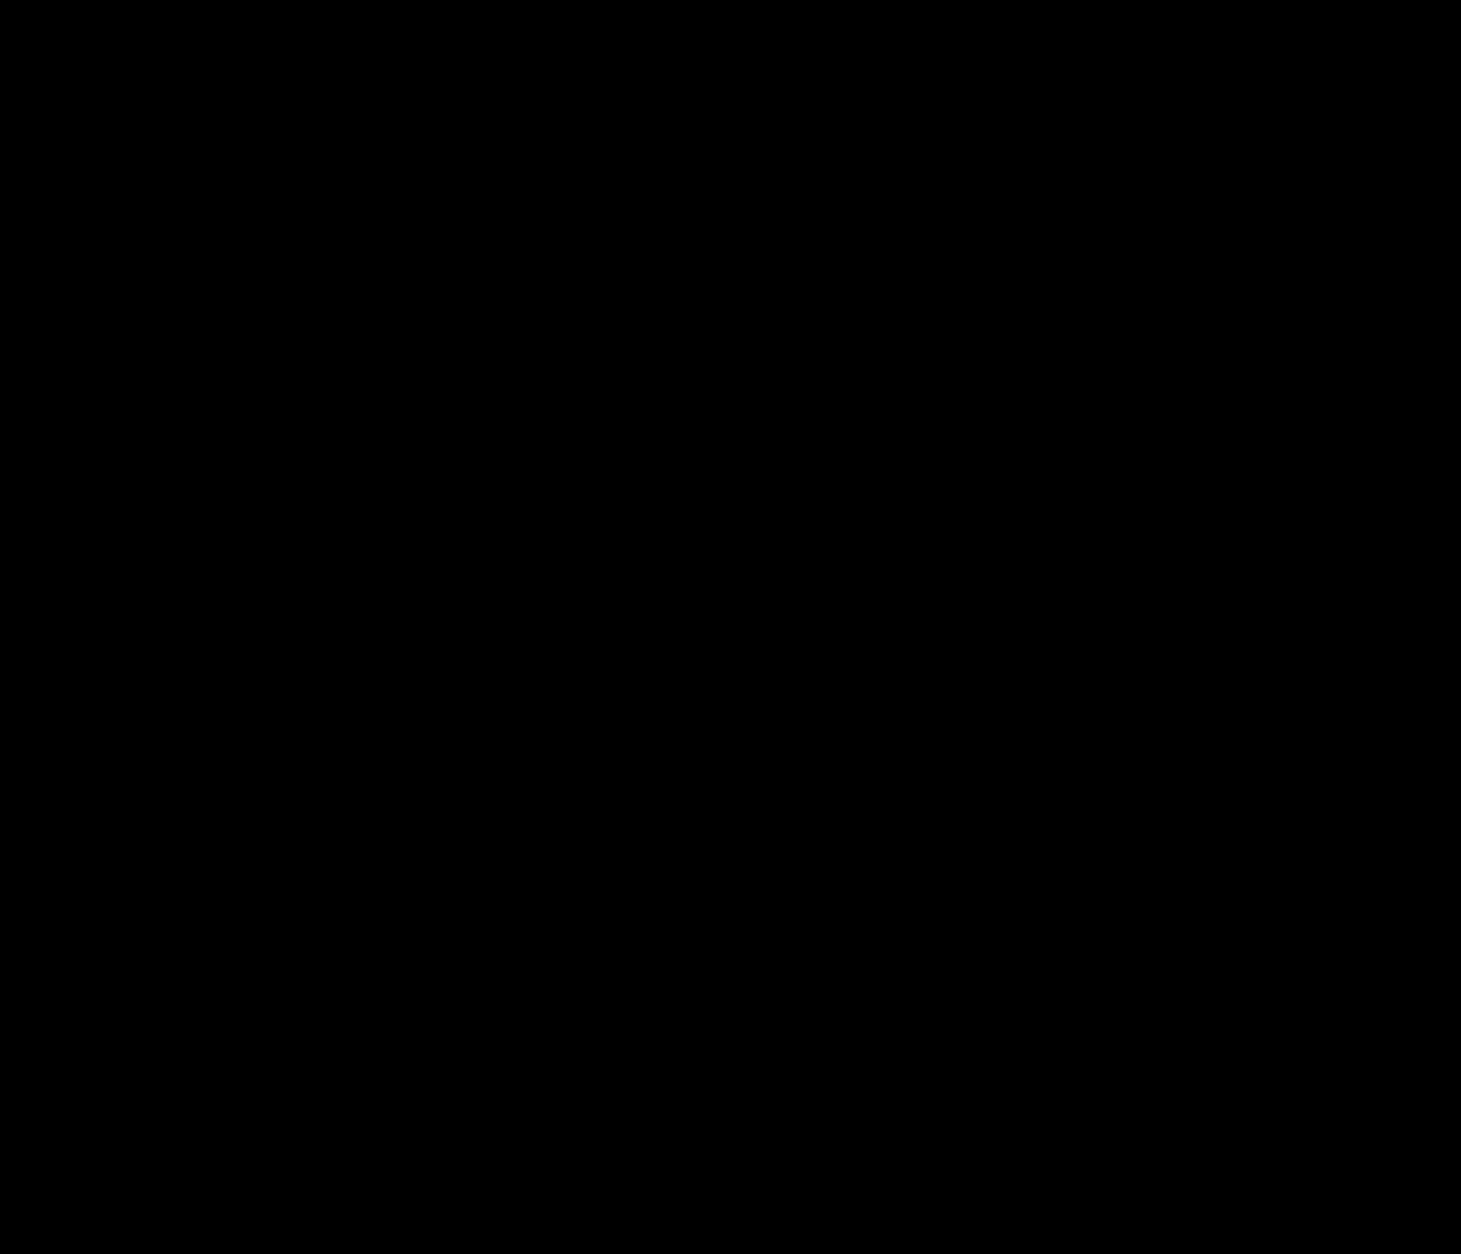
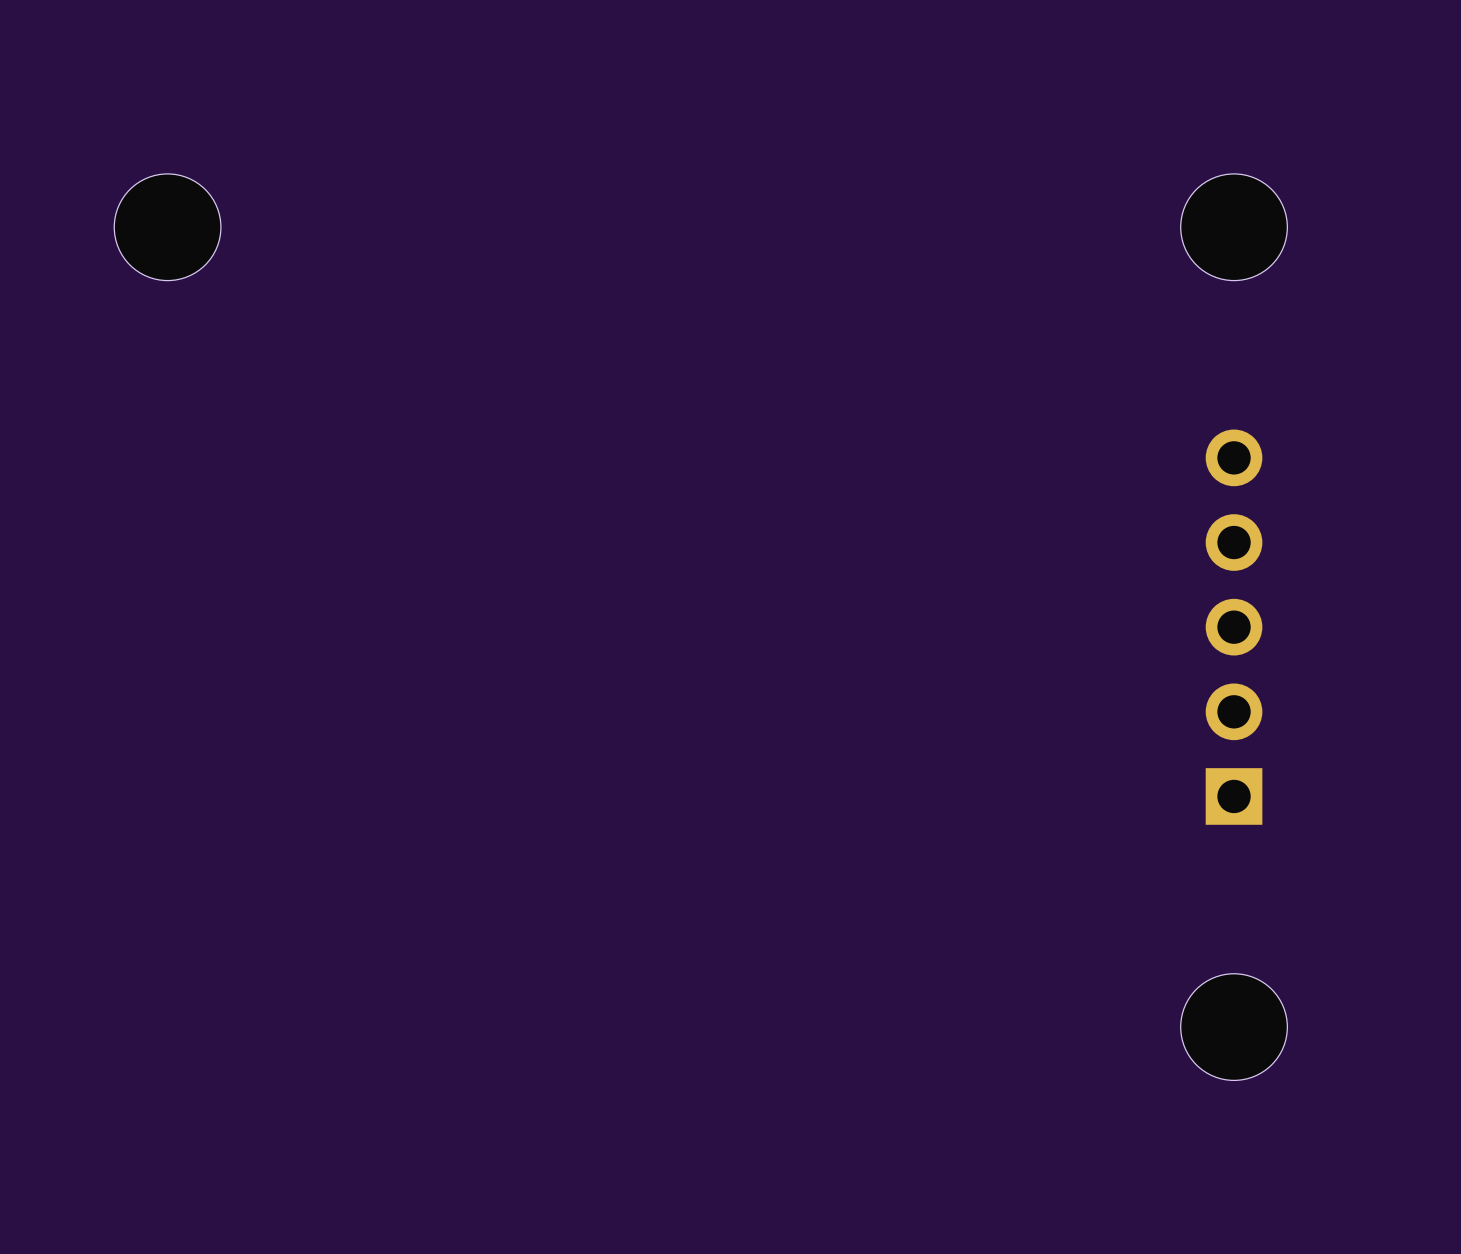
part: none -> (167, 227)
part: none -> (1234, 227)
part: none -> (1234, 627)
part: none -> (1234, 1027)

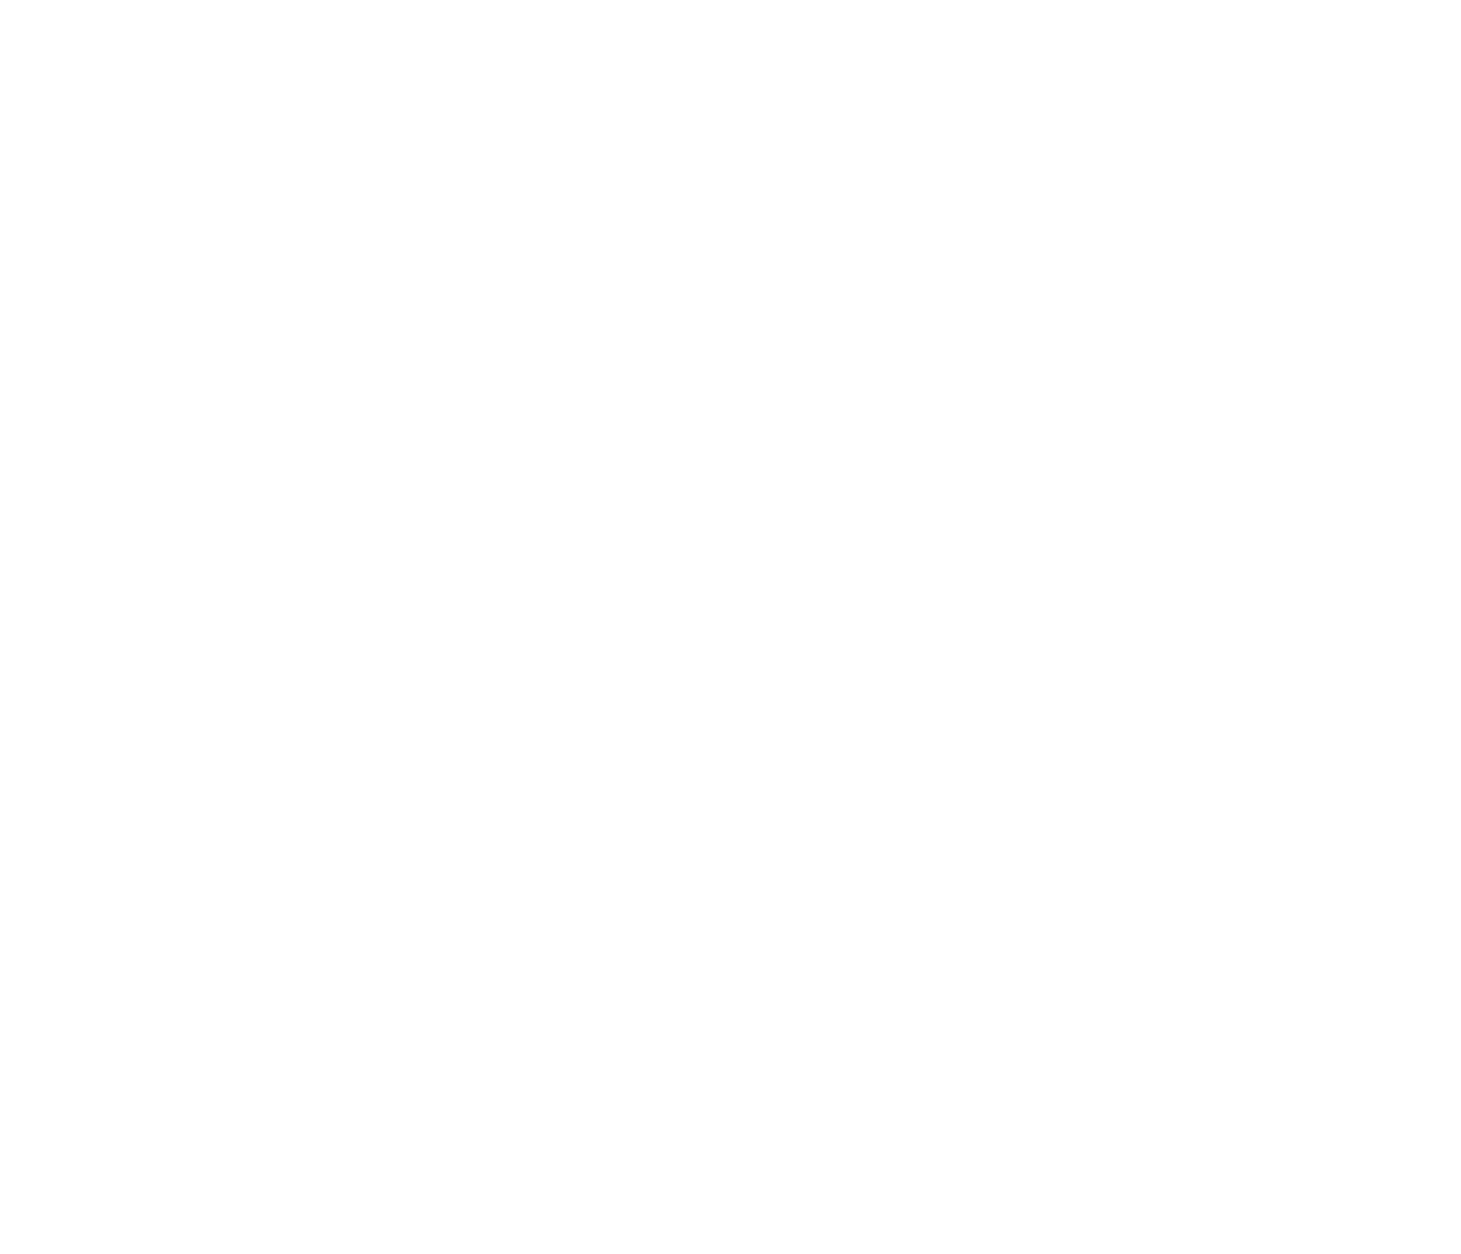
part: (167, 227) -> none
part: (1234, 227) -> none
part: (1234, 627) -> none
part: (1234, 1027) -> none

